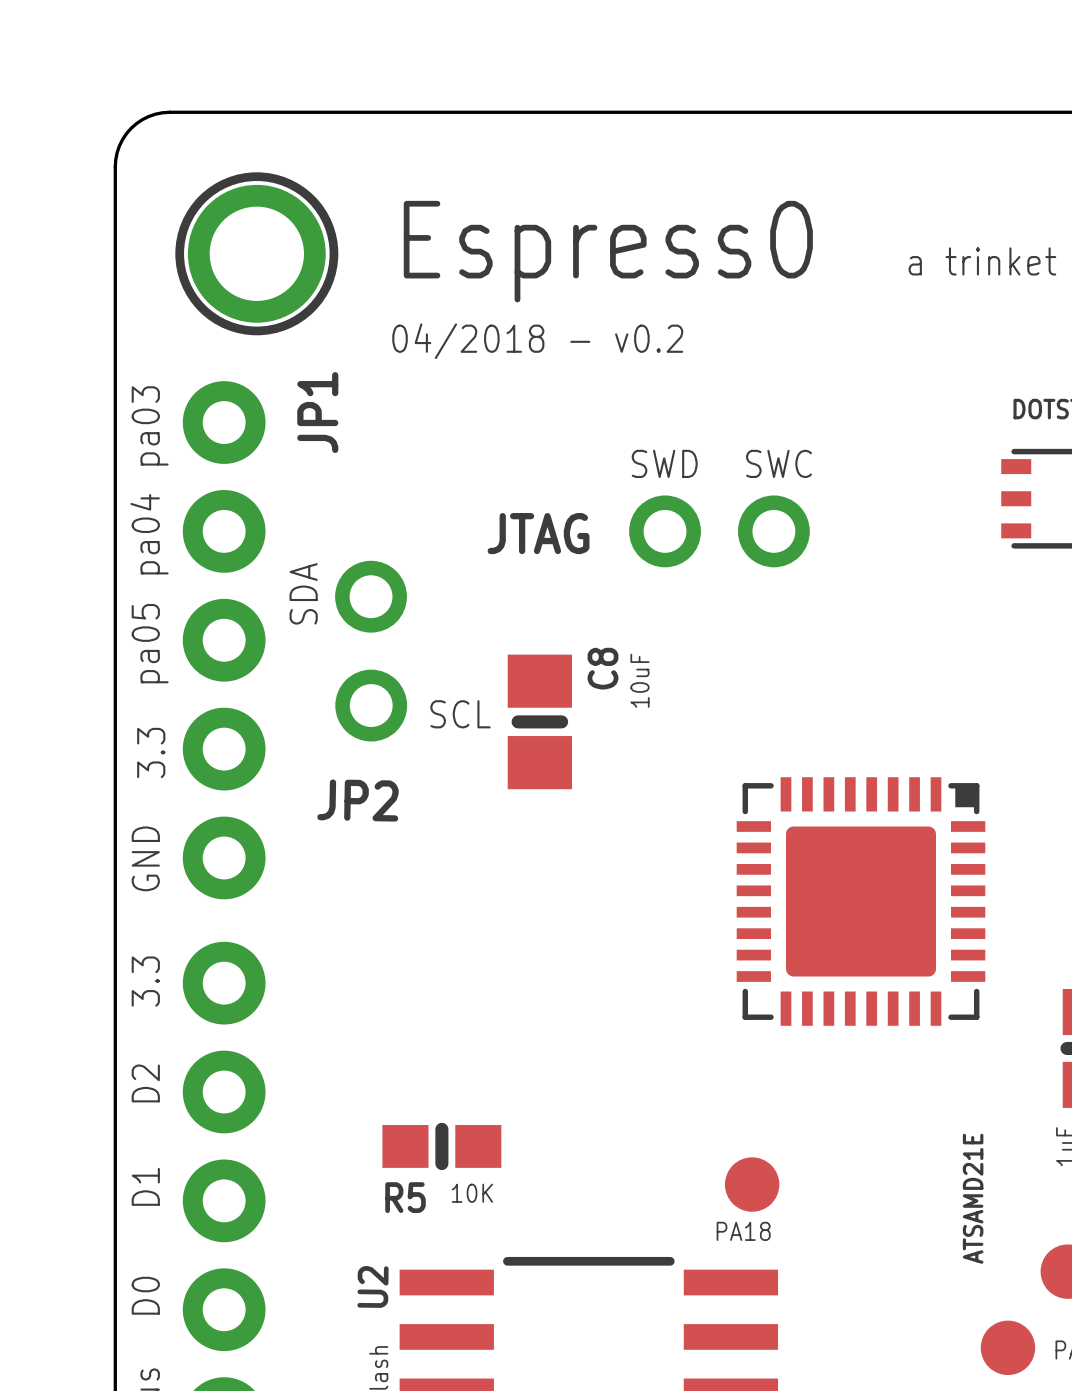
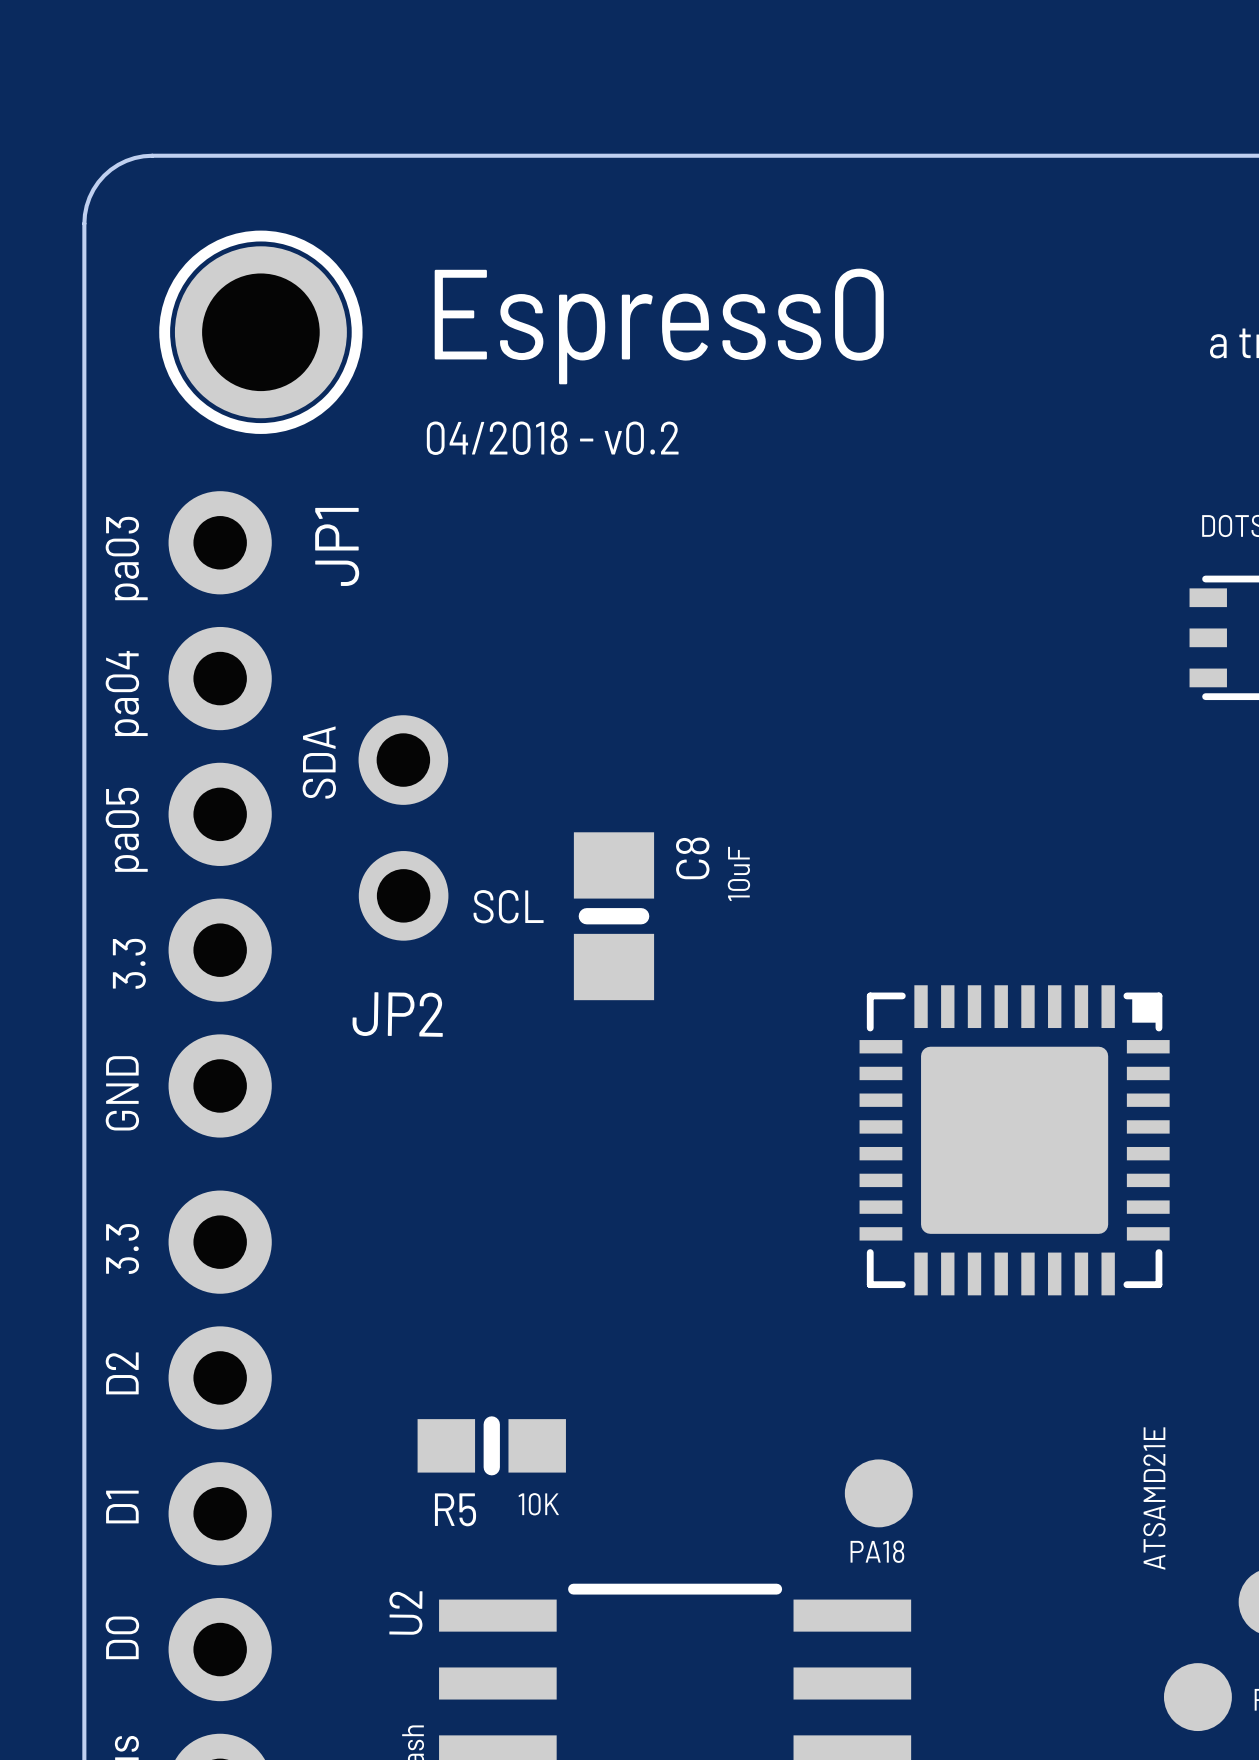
text: SWD (664, 463) -> none
text: SWC (779, 463) -> none
JTAG: (719, 531) -> none

